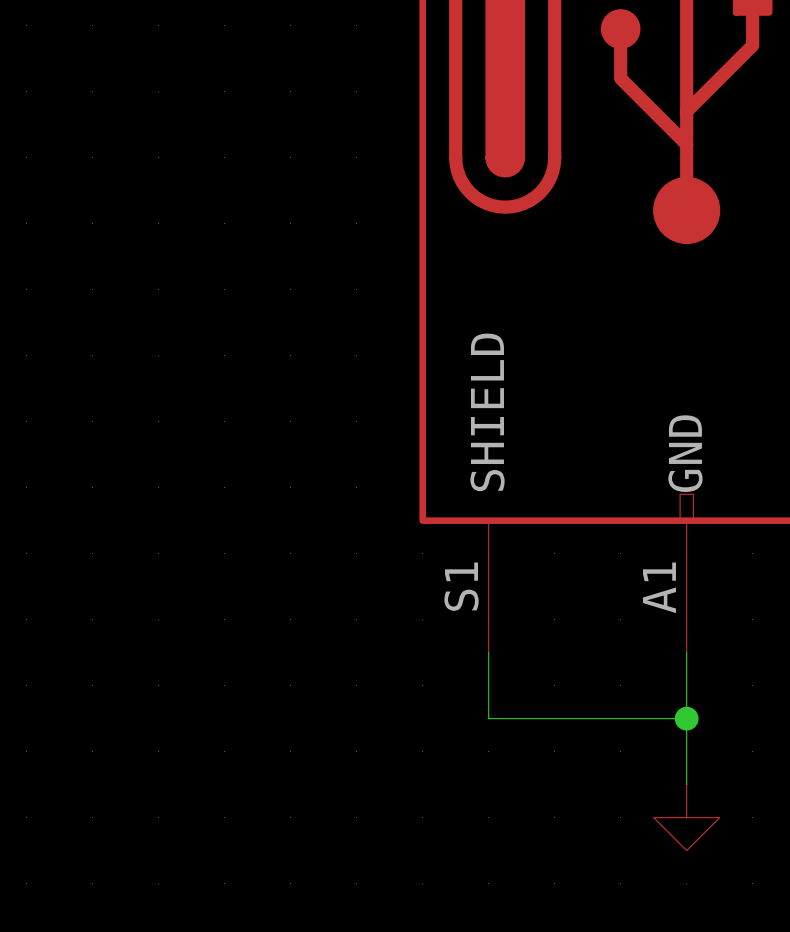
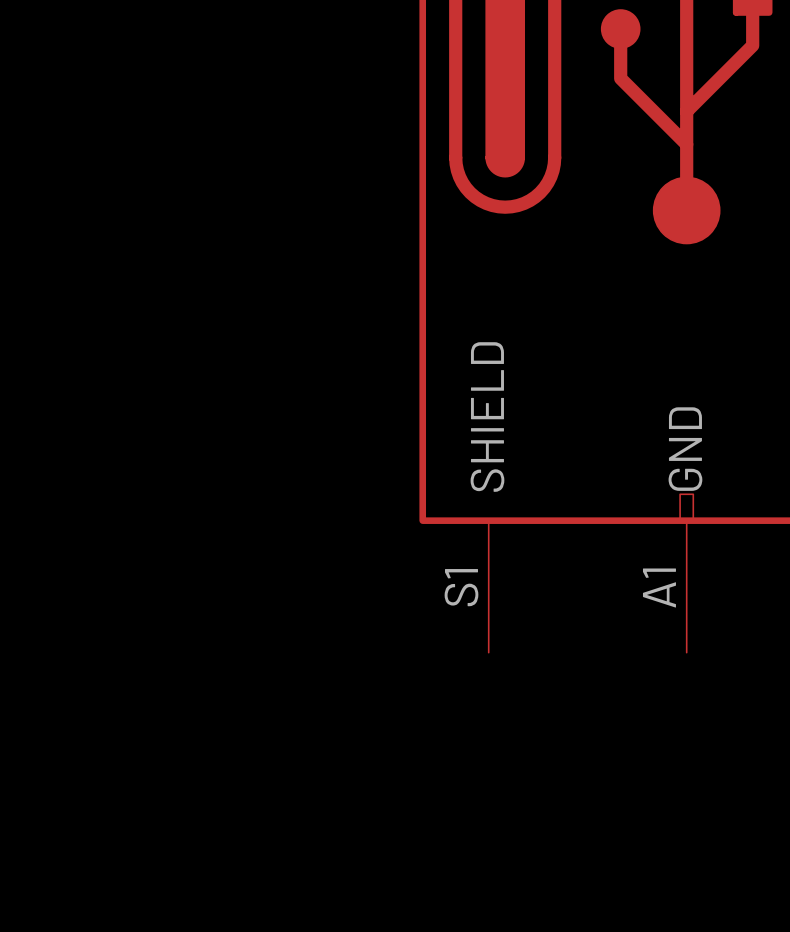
wire: (488, 652) (488, 718) (686, 718) -> none
wire: (686, 652) (686, 784) -> none
junction: (686, 718) -> none
power symbol: (686, 817) -> none

